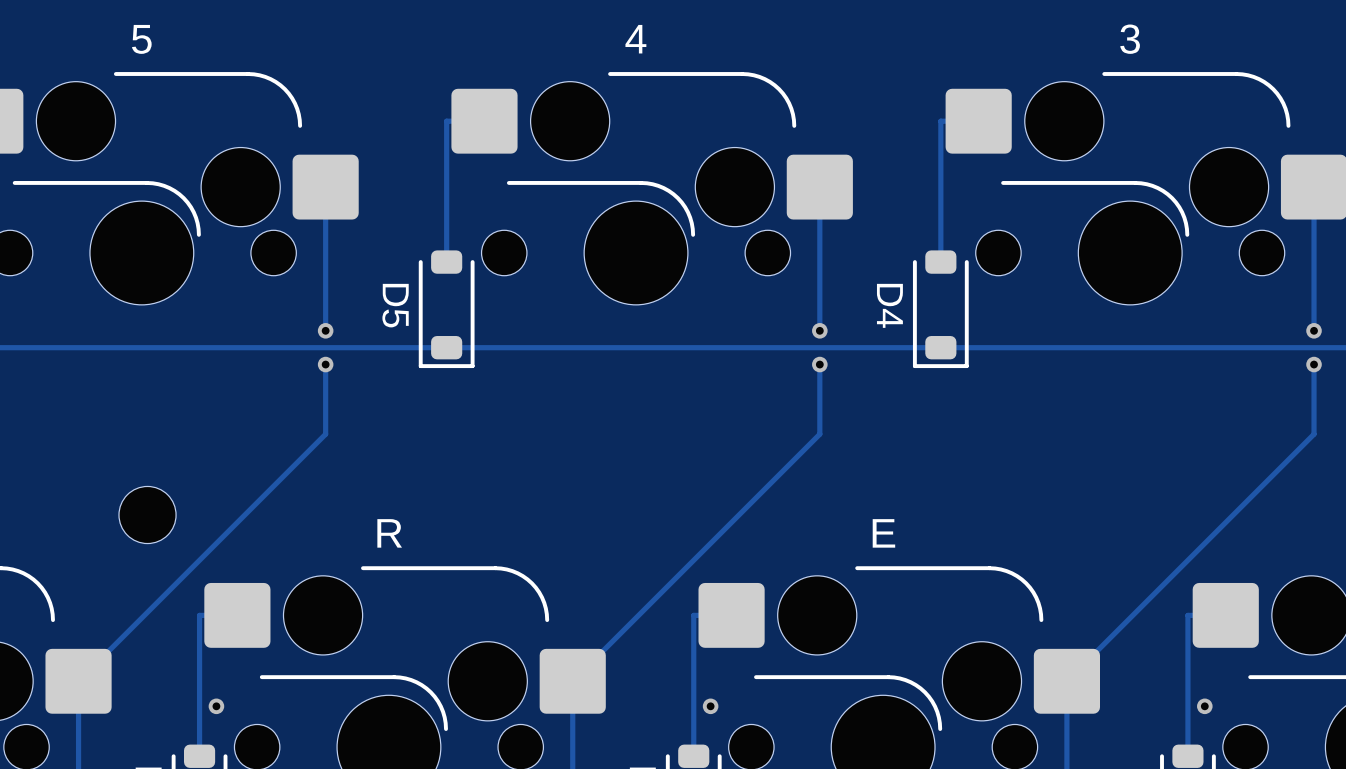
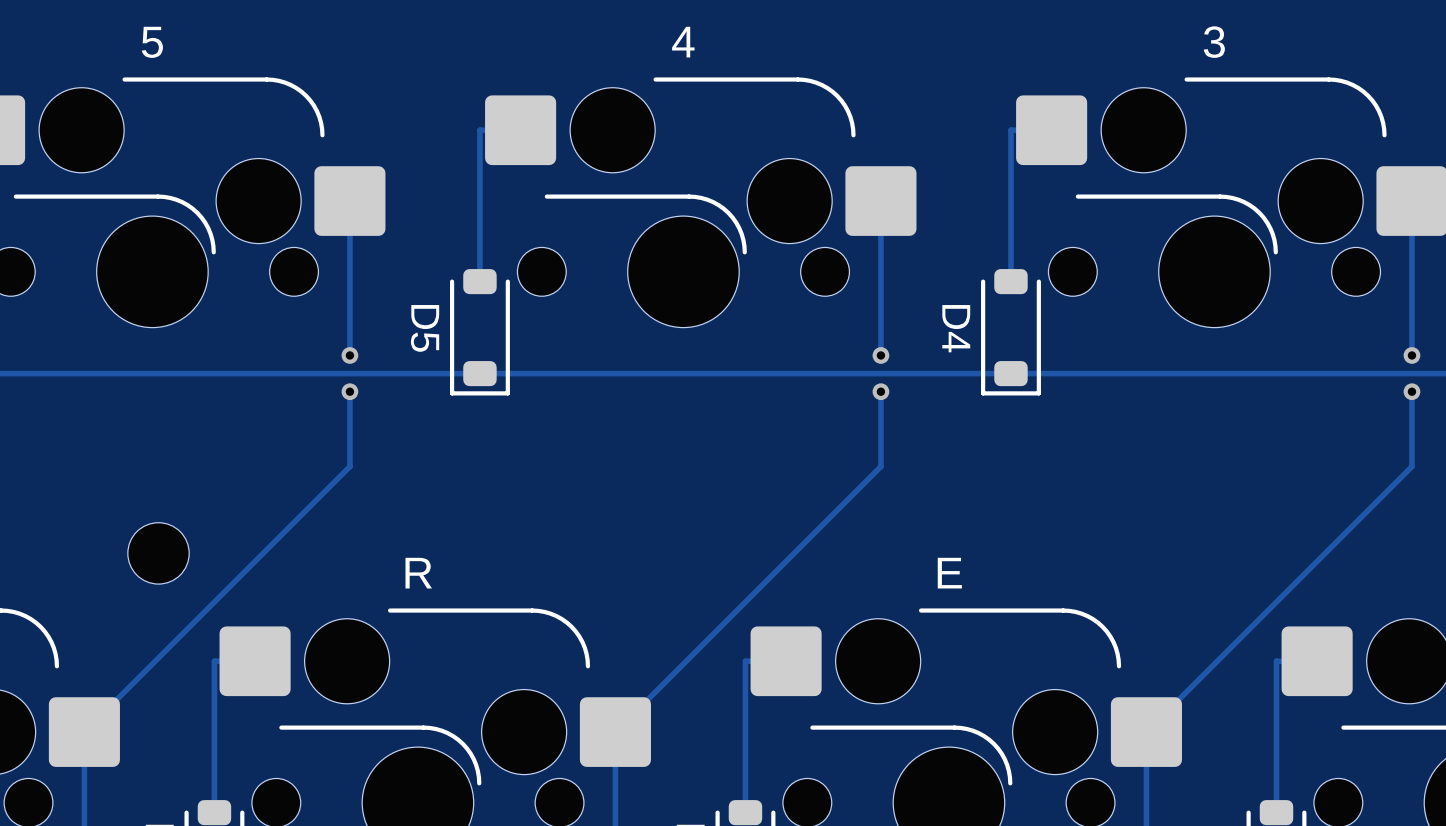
via: (216, 706) -> none
via: (710, 706) -> none
via: (1204, 706) -> none

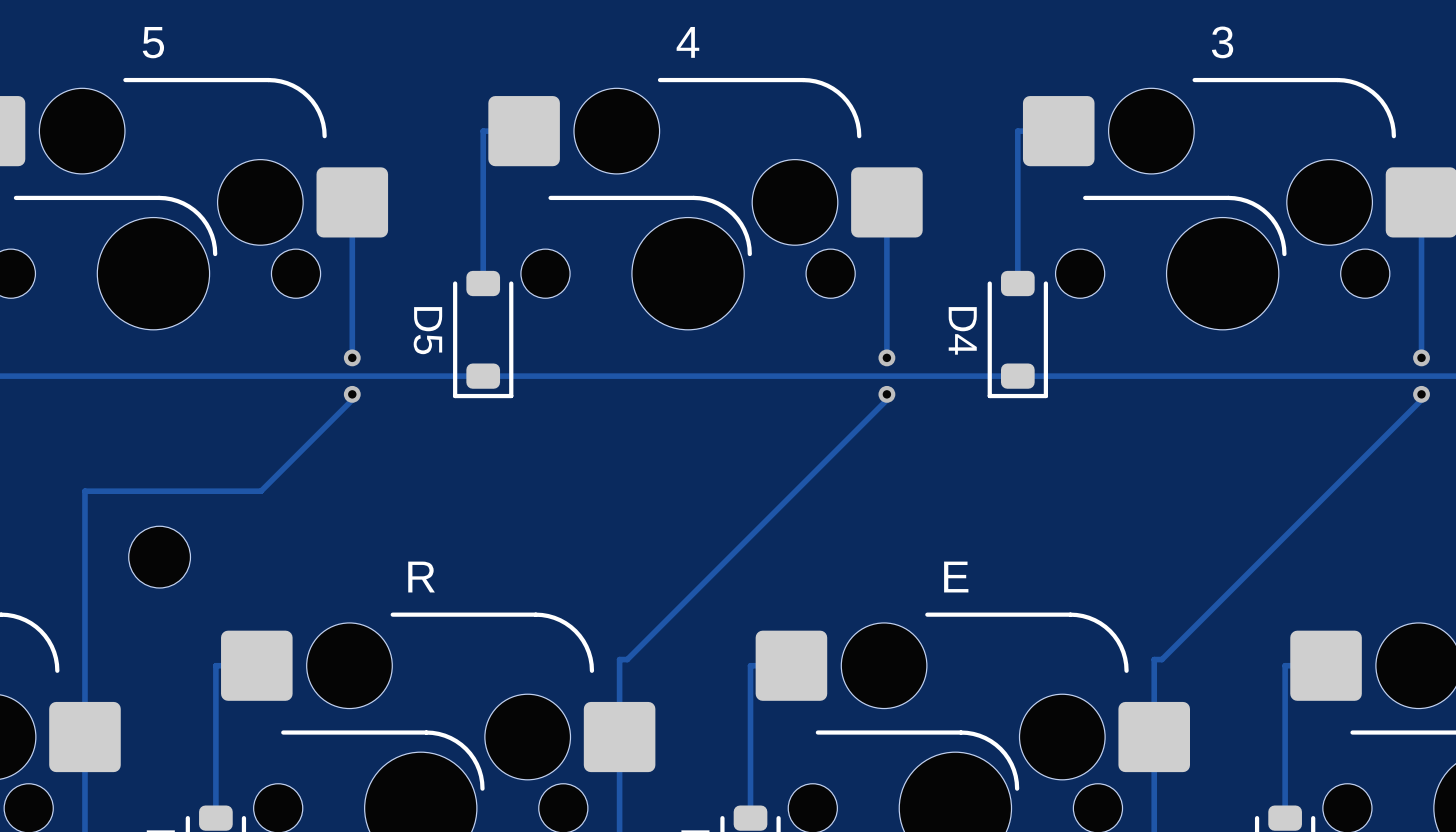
track: (349, 397) (349, 466) (84, 732) -> (352, 399) (261, 491) (84, 491) (84, 737)
track: (880, 397) (880, 466) (615, 732) -> (886, 399) (627, 659) (619, 659) (619, 737)
track: (1411, 397) (1411, 466) (1146, 732) -> (1421, 399) (1161, 659) (1154, 659) (1154, 737)

